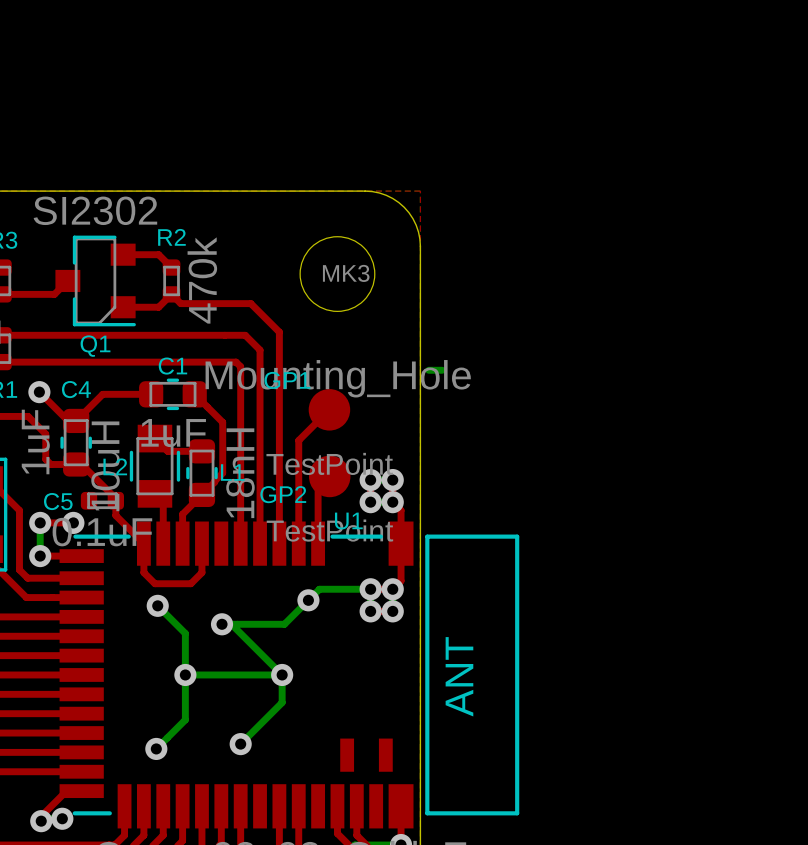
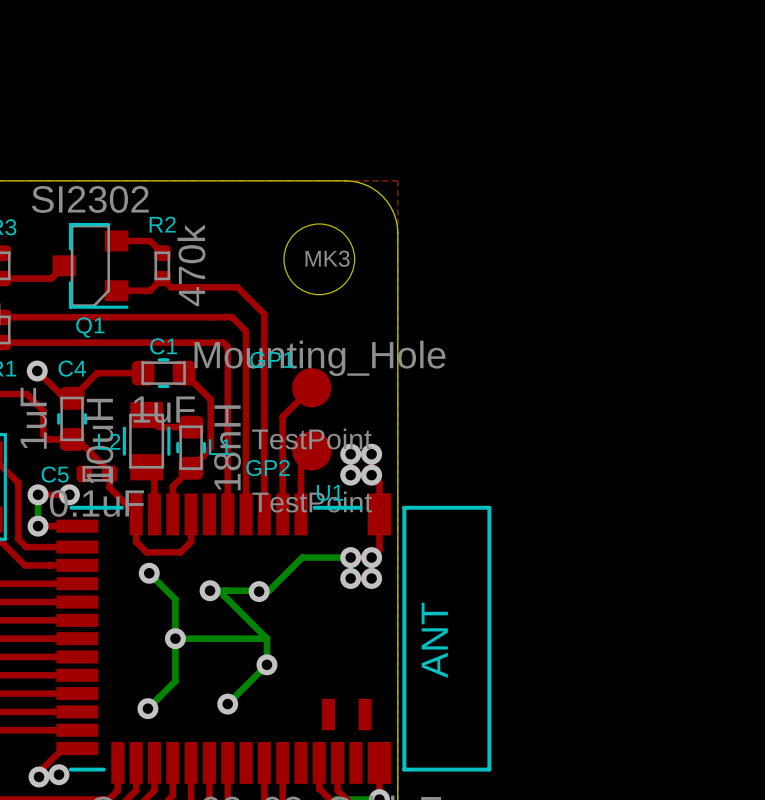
bottom track: (428, 370) (442, 370) -> none
via: (308, 600) -> none
via: none -> (259, 591)
via: (282, 674) -> none
via: none -> (266, 664)

